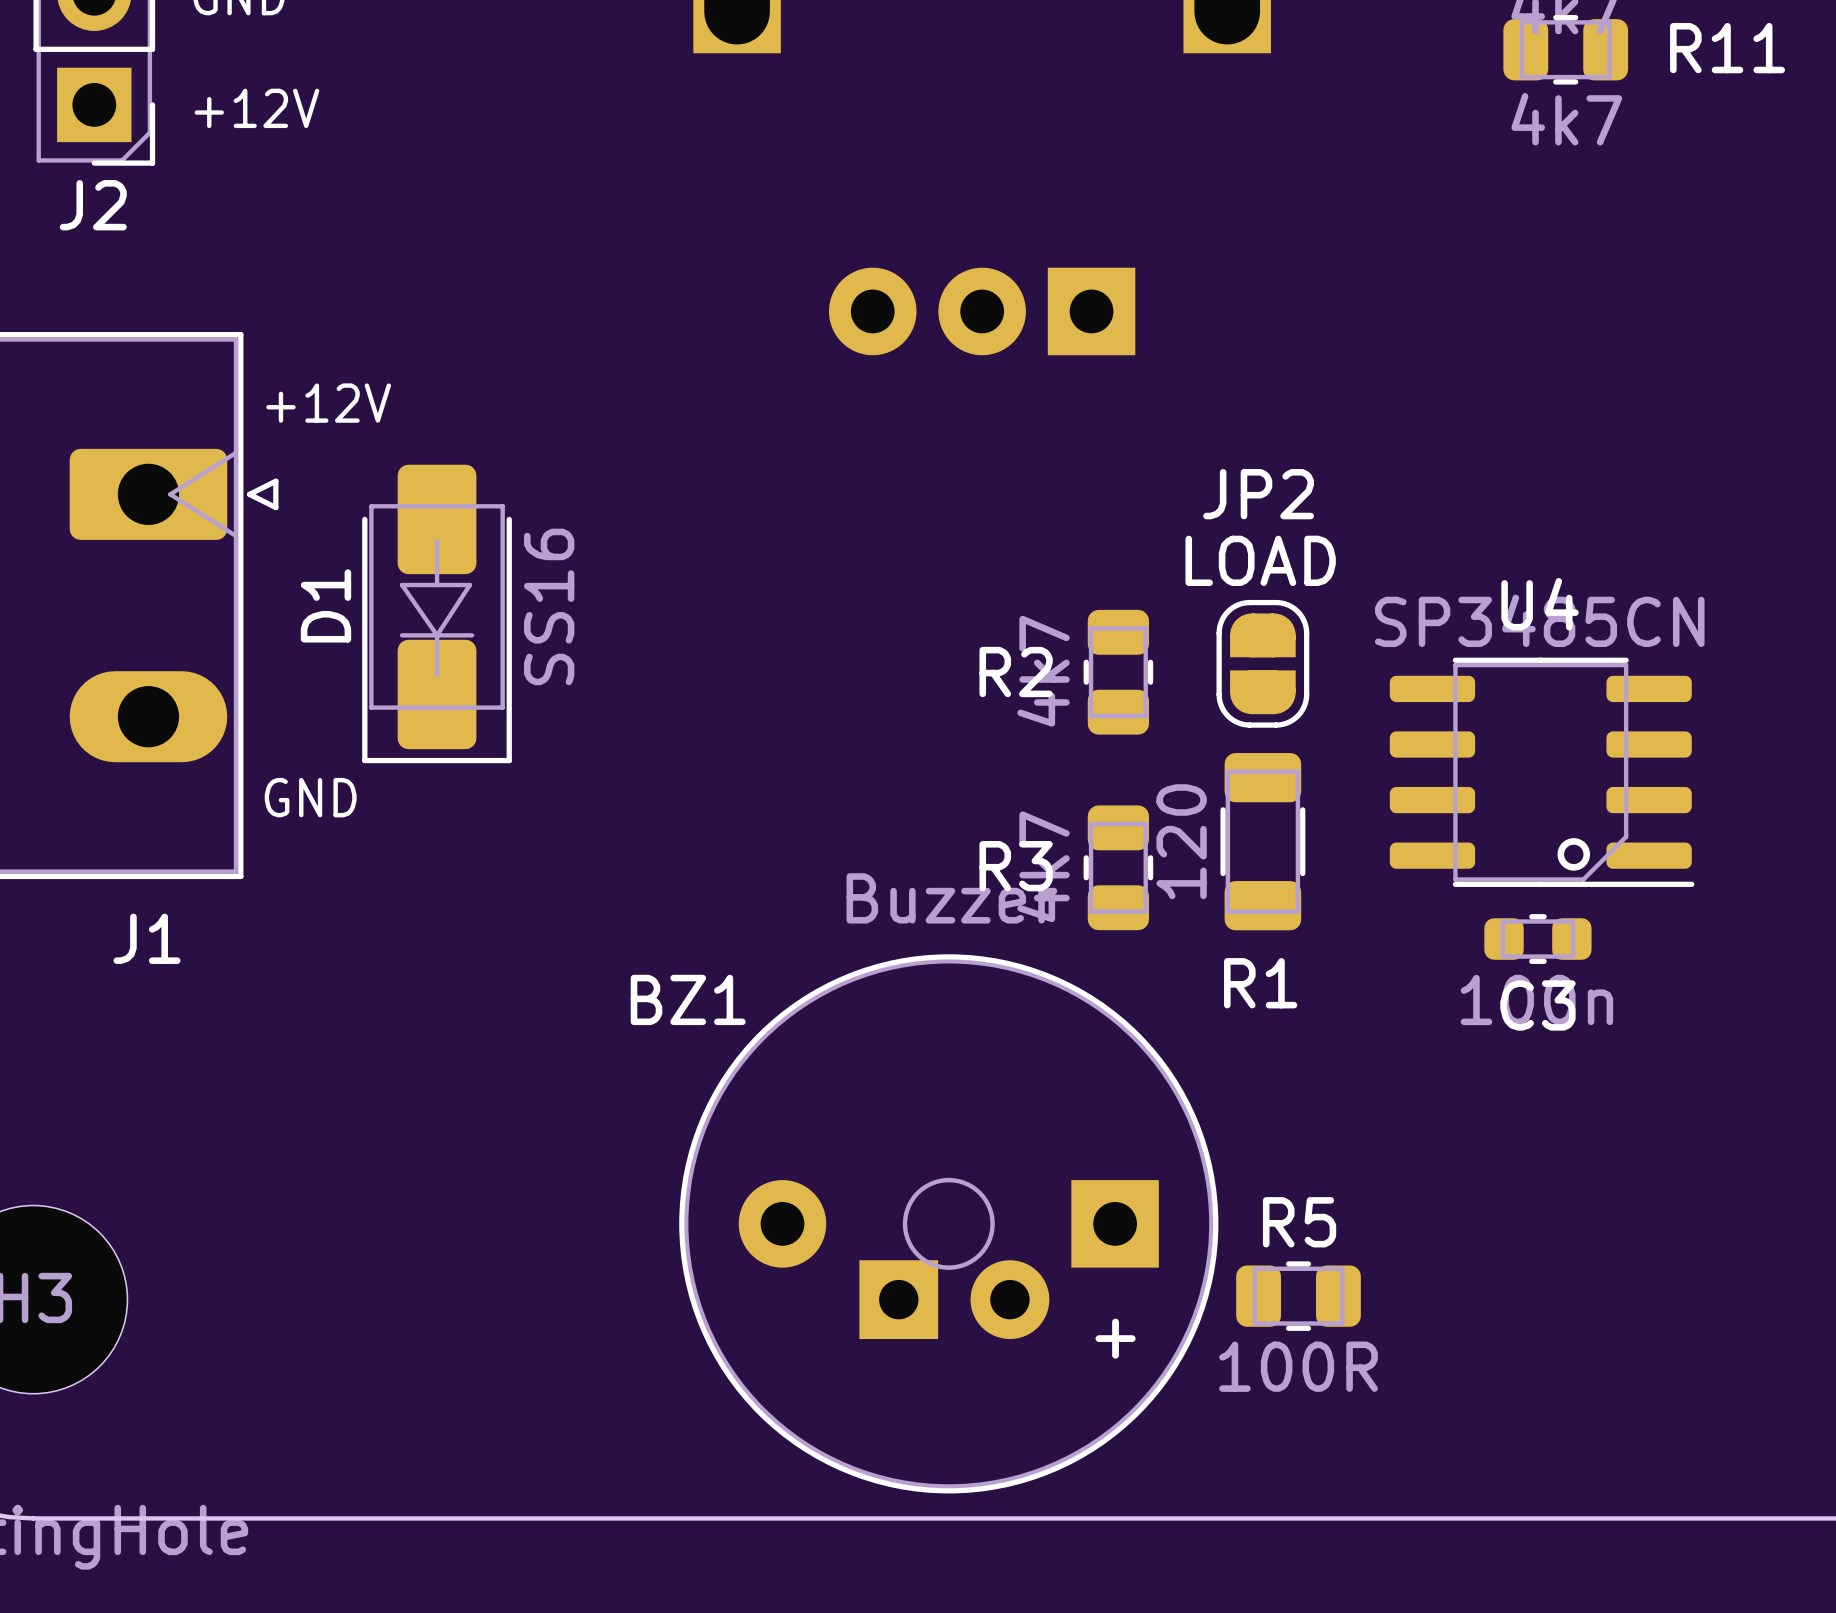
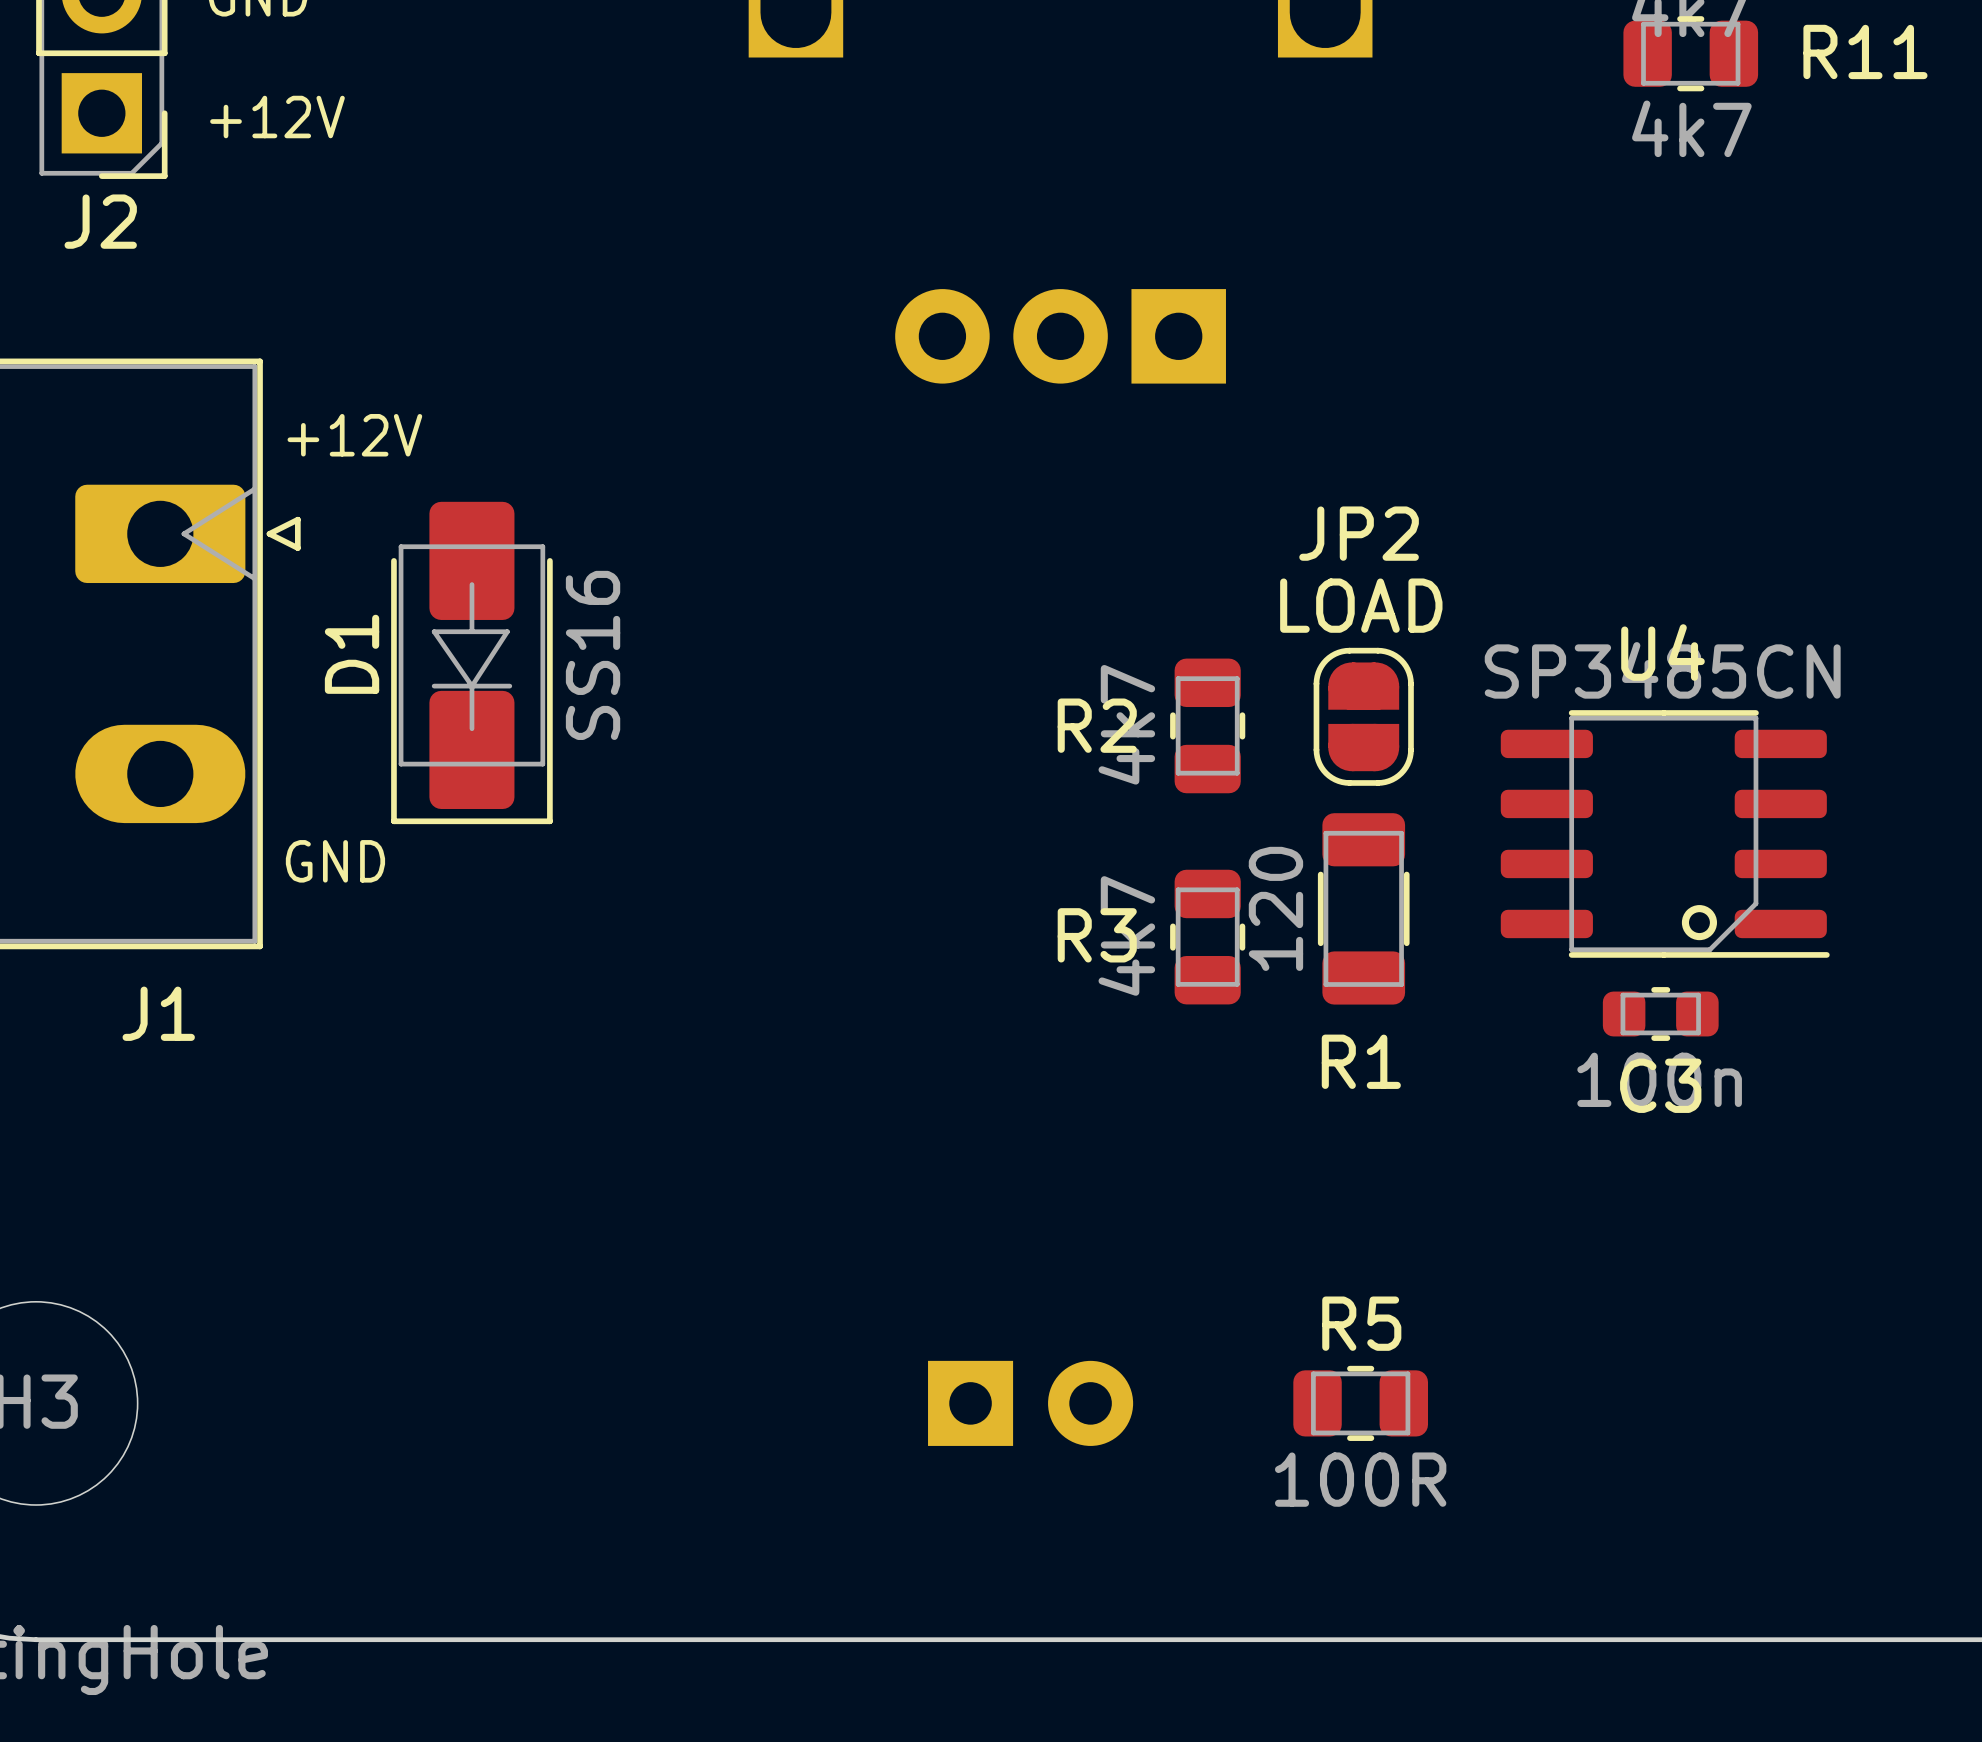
BZ1: Buzzer (948, 1223) -> none
R5 position: (1298, 1296) -> (1360, 1403)

